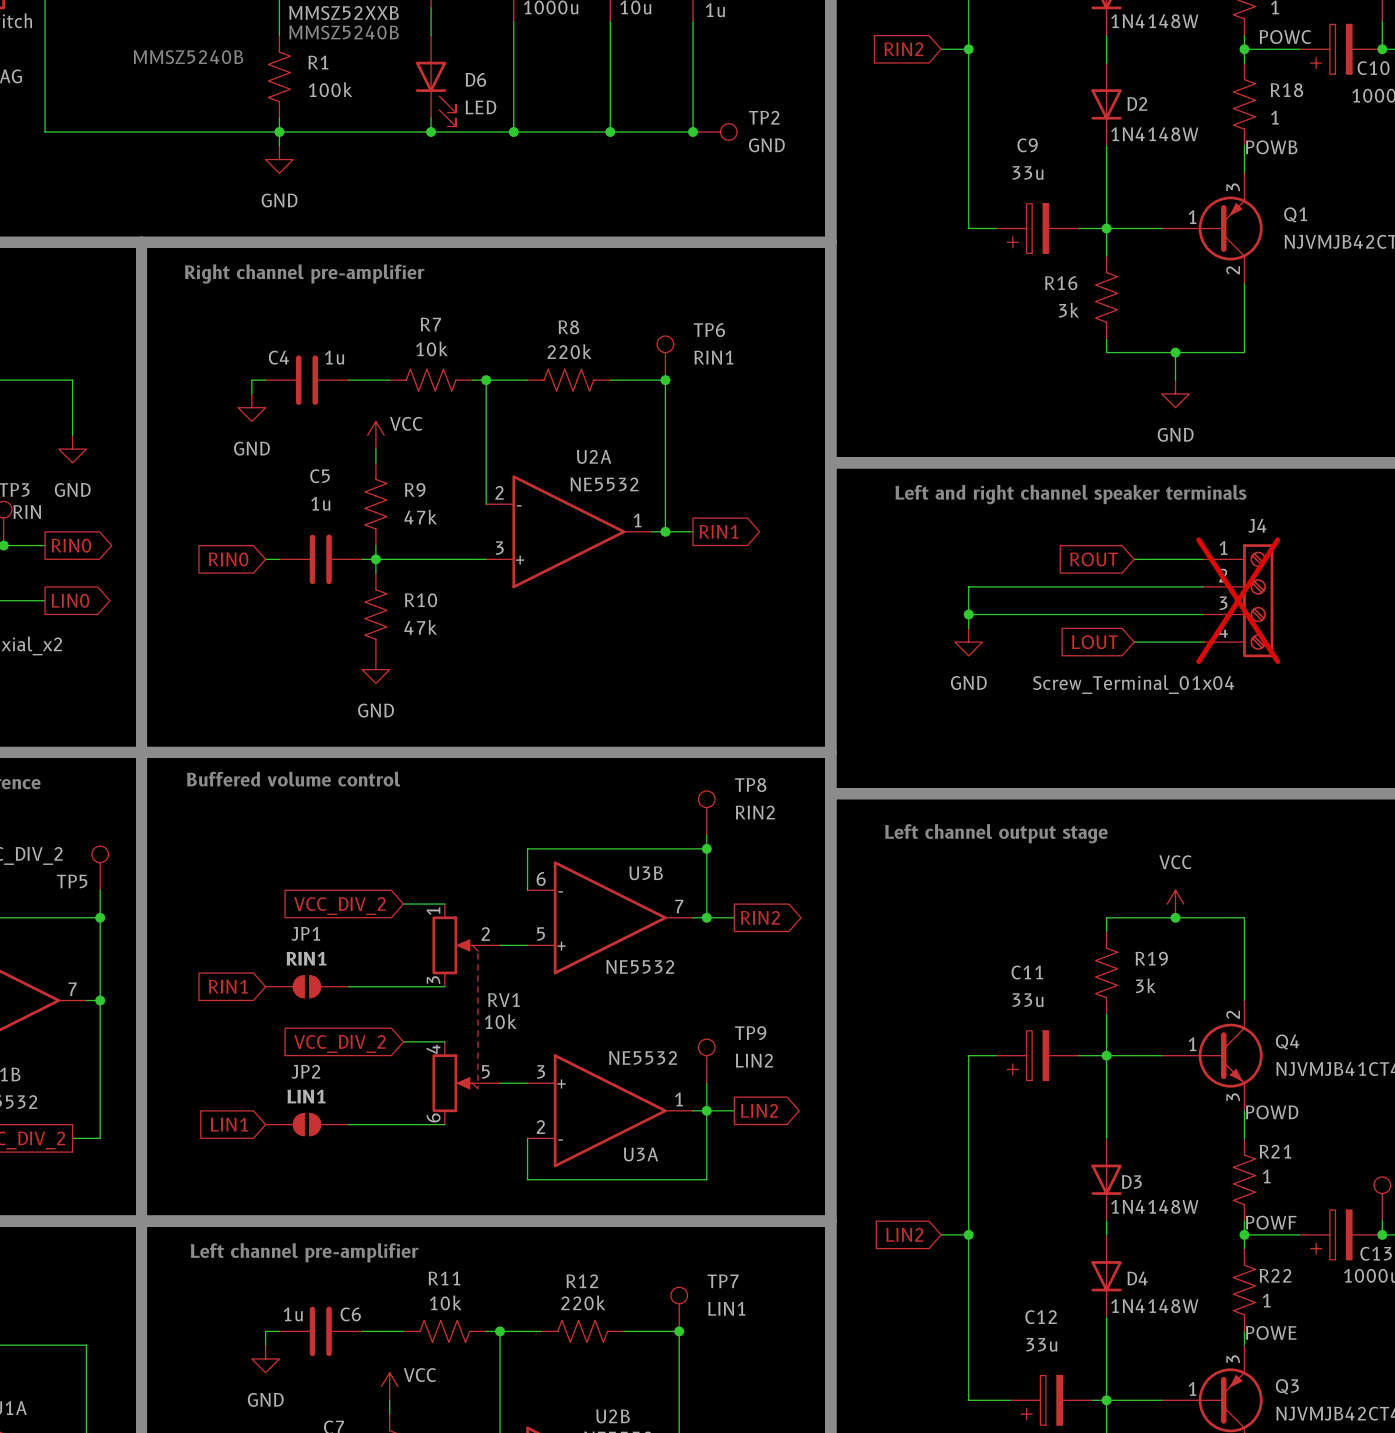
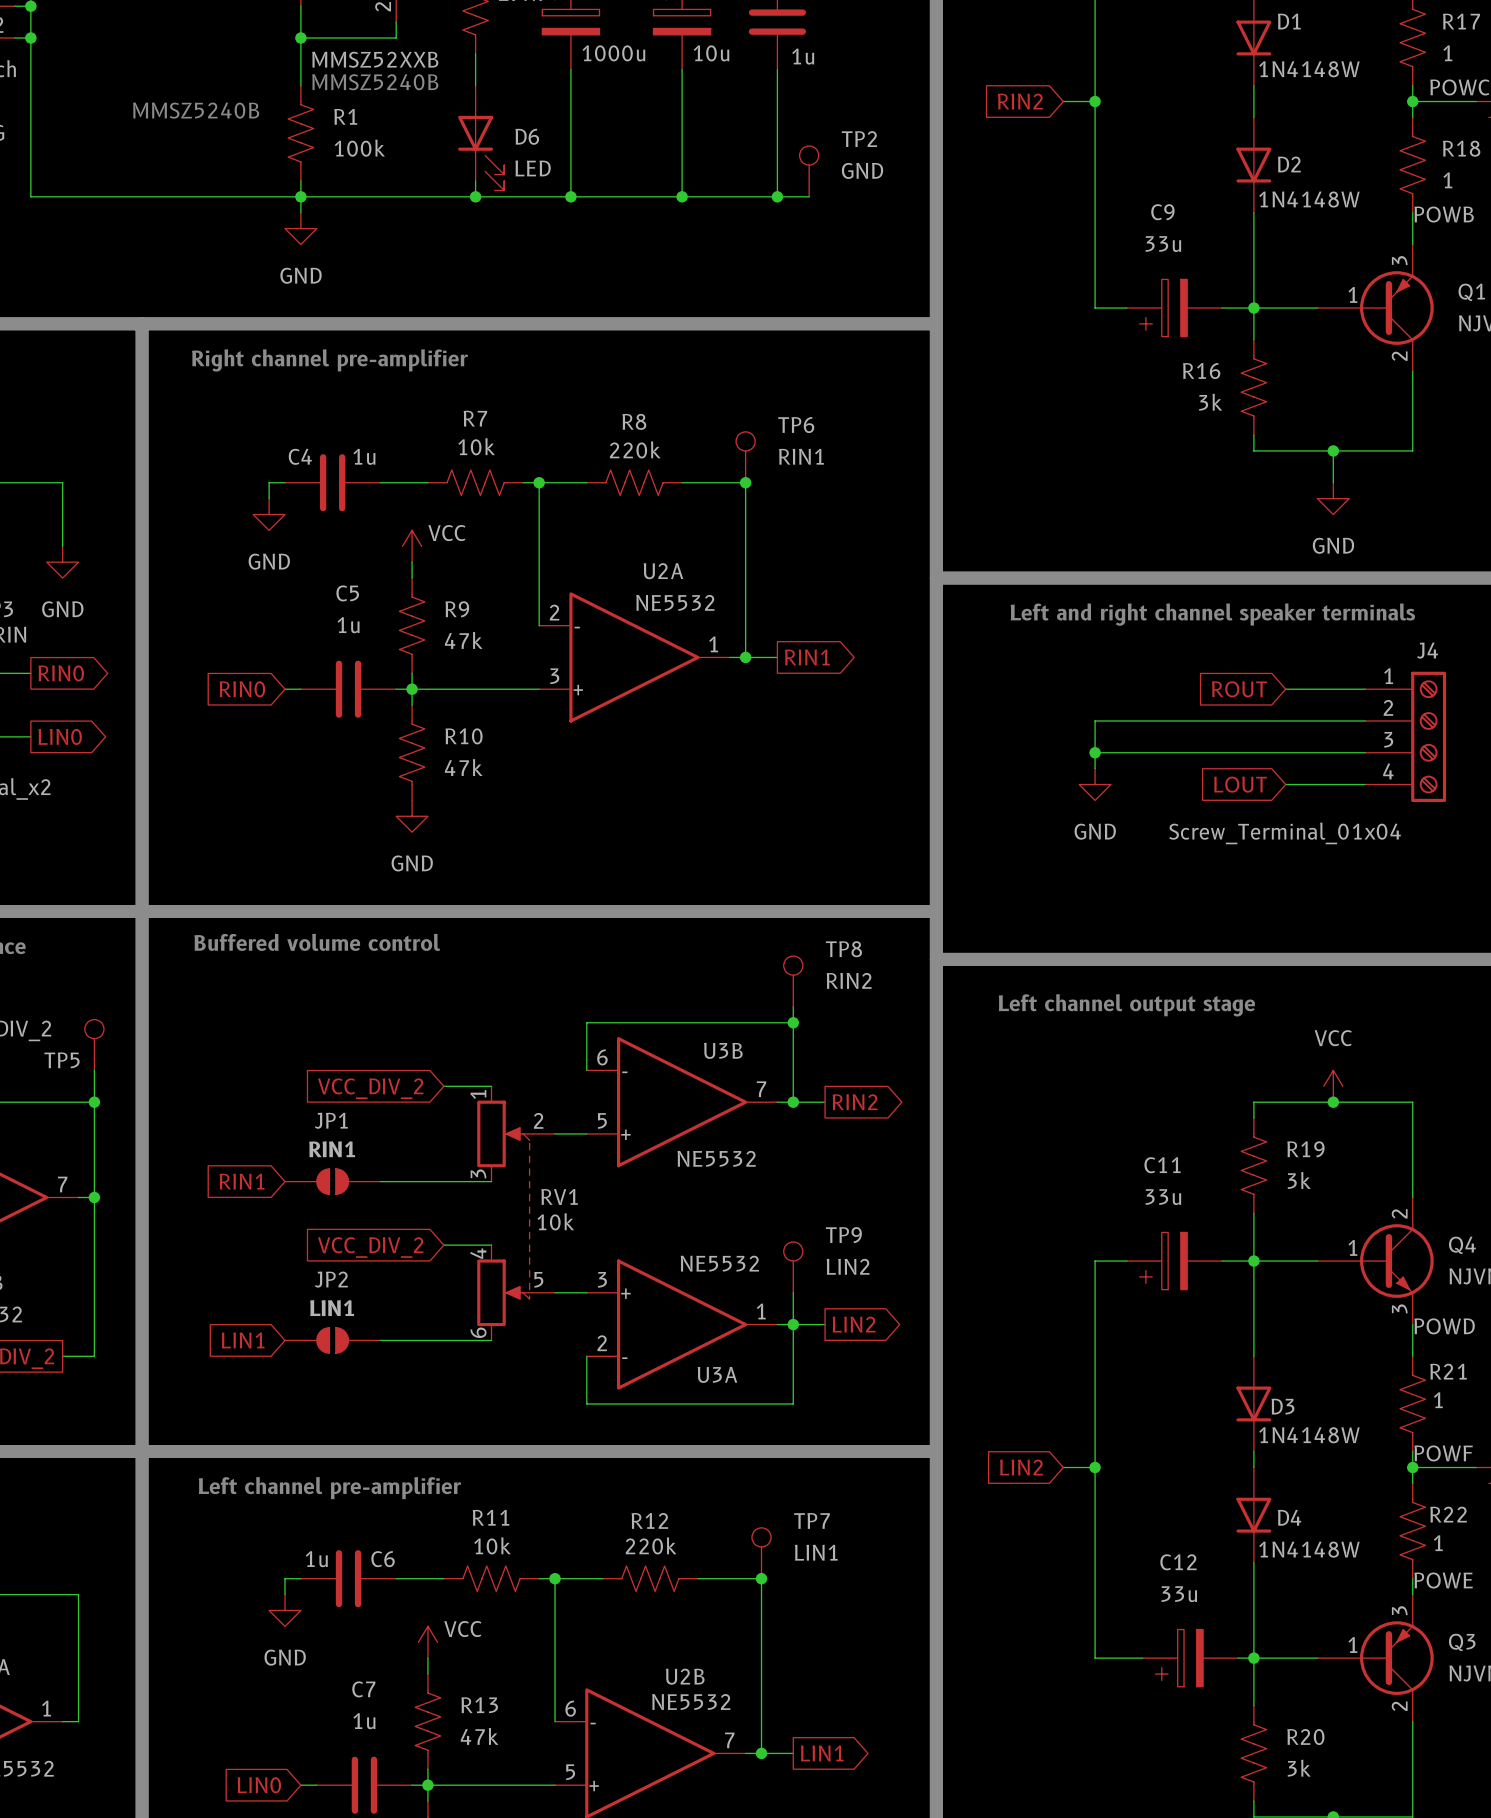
TP2 rotation: 0° (728, 131) -> 90° counterclockwise (809, 155)
J4 do-not-place cross: (1238, 600) -> none

